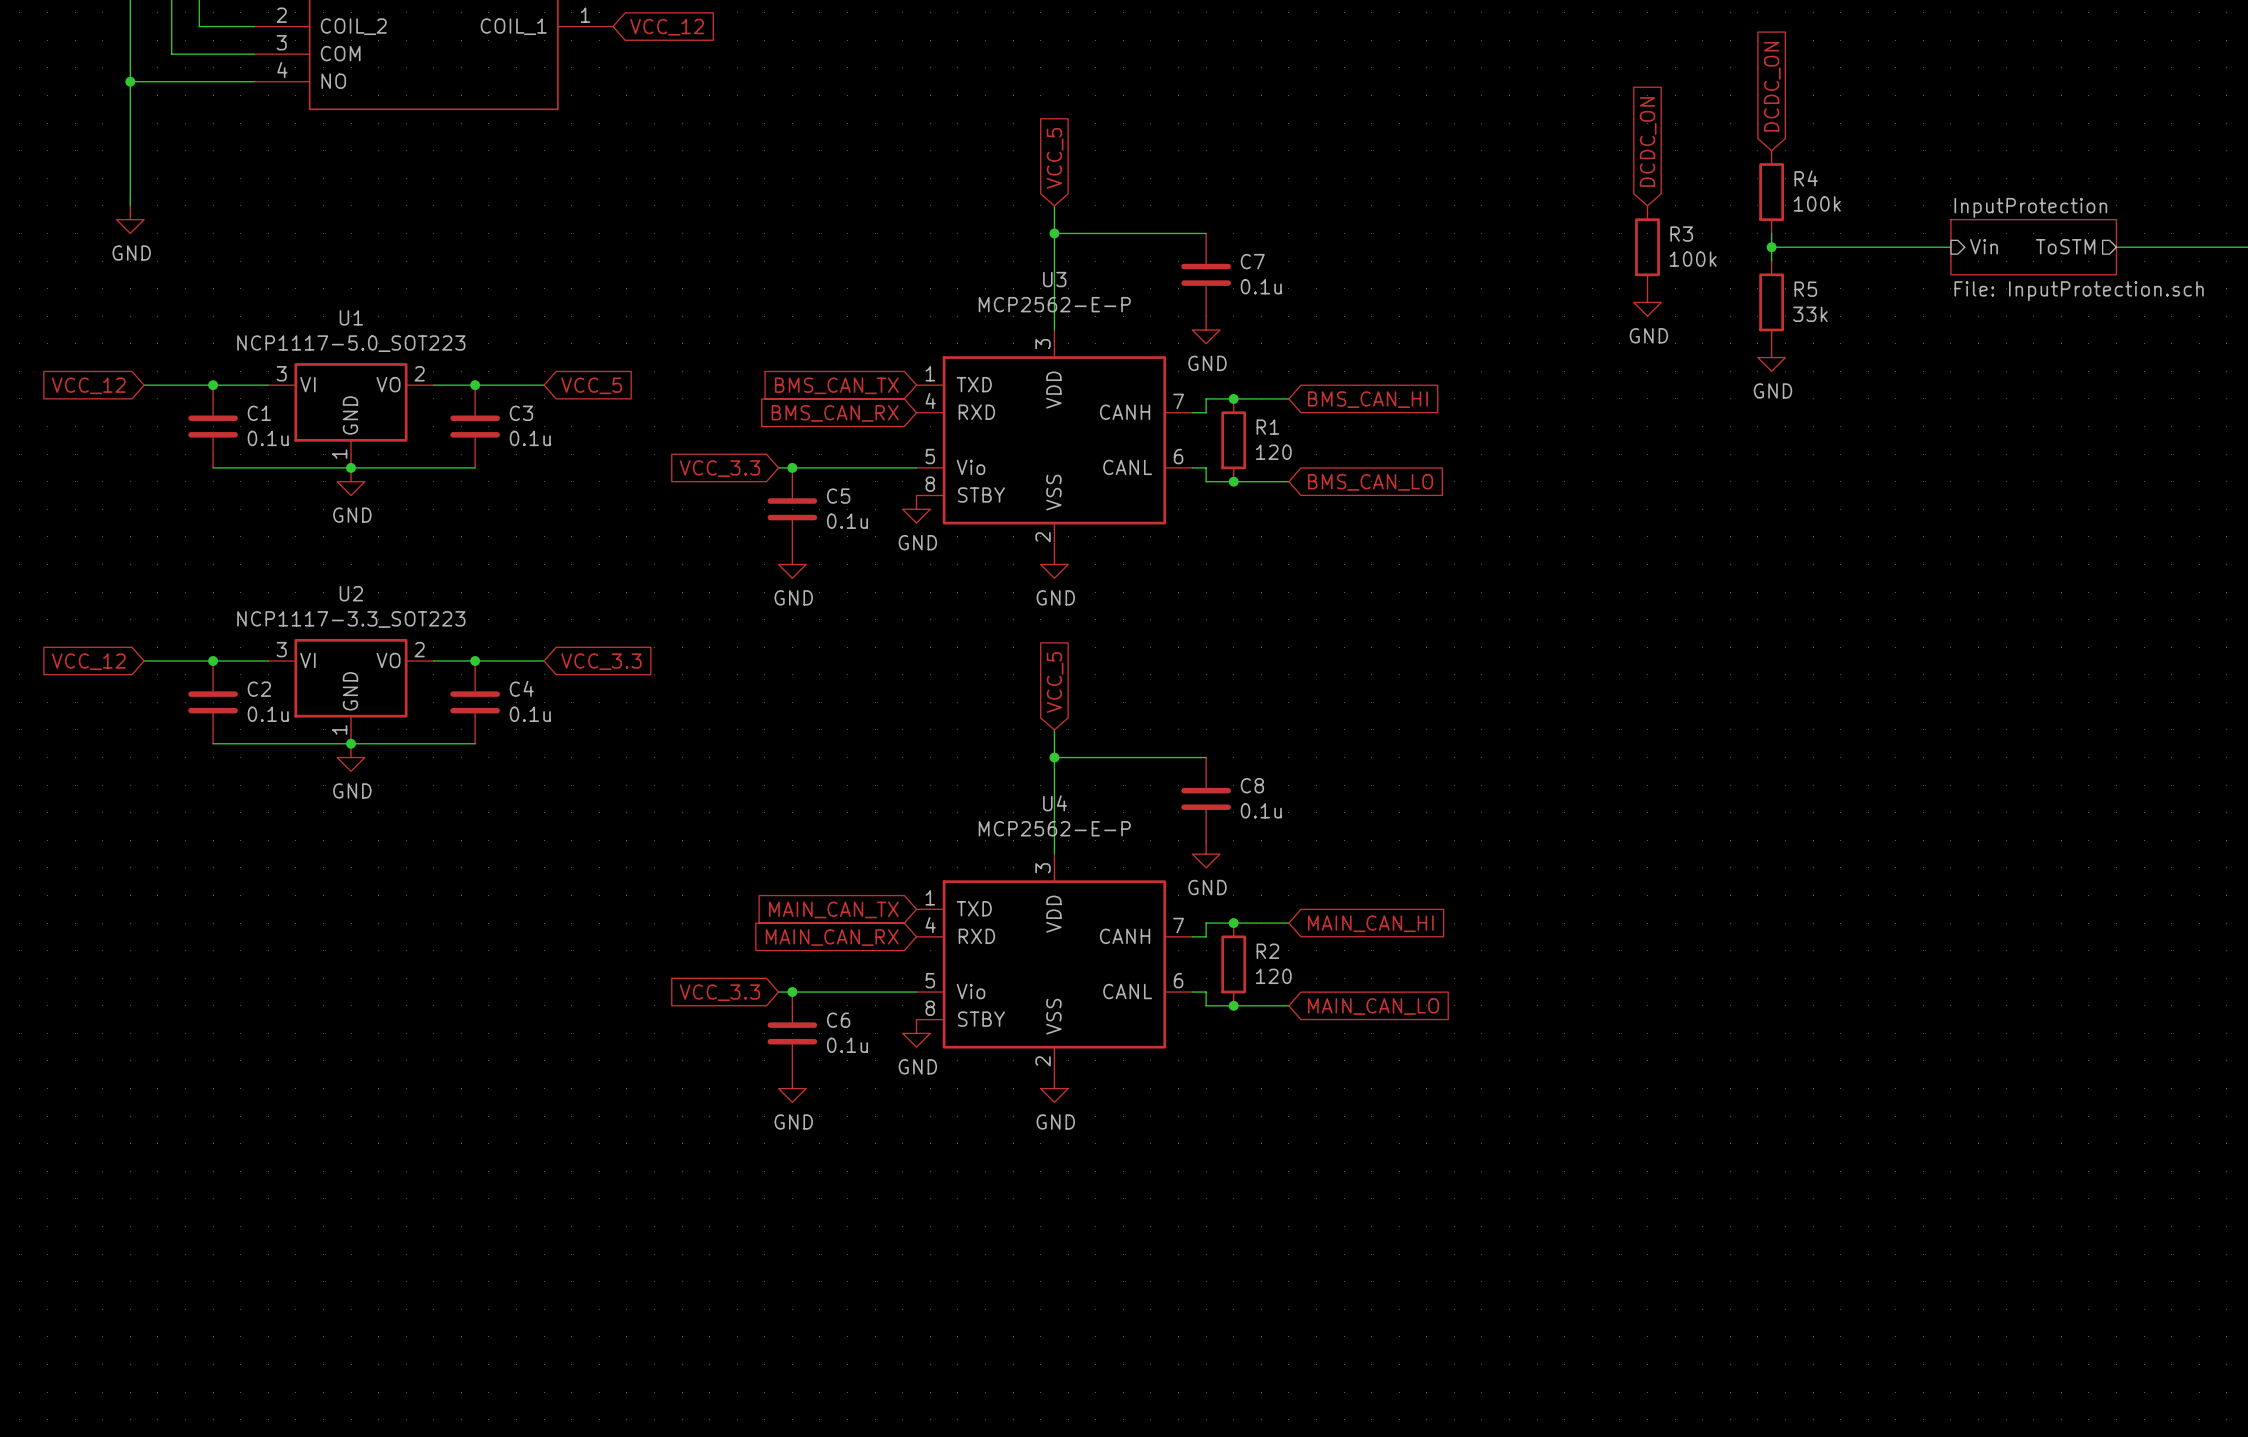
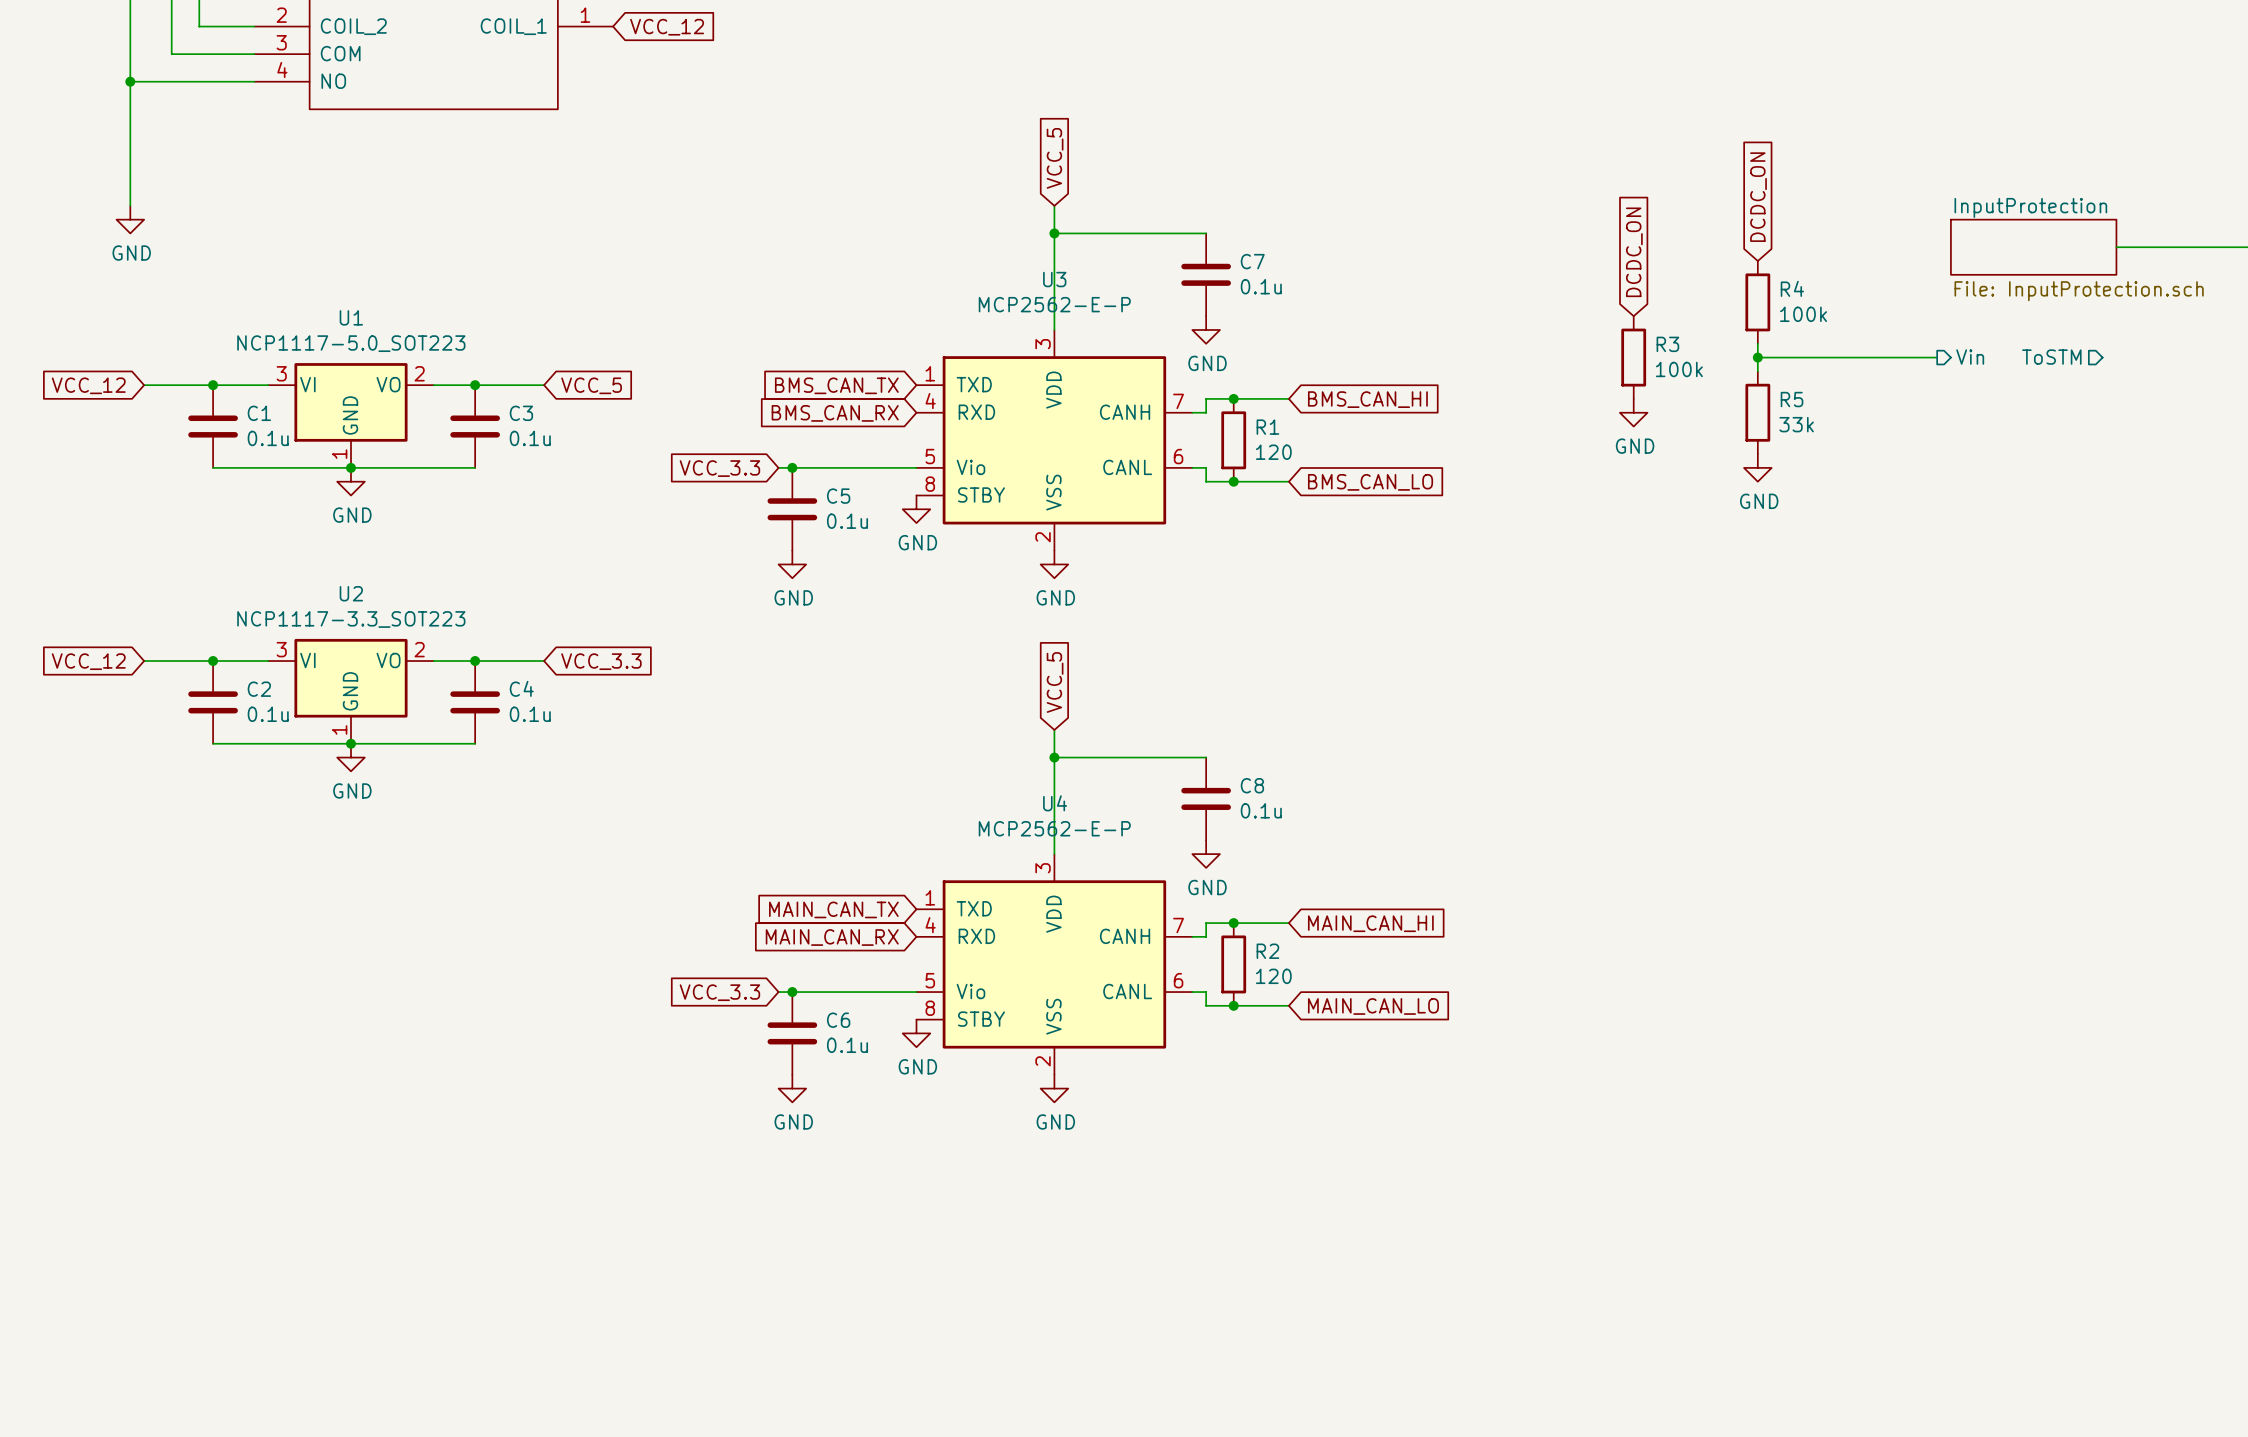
global label position: DCDC_ON (1772, 86) -> DCDC_ON (1758, 197)
global label position: DCDC_ON (1648, 141) -> DCDC_ON (1634, 252)
R4 position: (1771, 192) -> (1757, 302)
wire: (1771, 233) (1771, 261) -> (1757, 343) (1757, 371)
sheet pin position: Vin (1983, 246) -> Vin (1970, 357)
sheet pin position: ToSTM (2065, 246) -> ToSTM (2051, 357)
R3 position: (1647, 247) -> (1633, 357)
wire: (1771, 247) (1950, 247) -> (1757, 357) (1937, 357)
junction: (1771, 247) -> none
power symbol: GND (1647, 302) -> none
R5 position: (1771, 302) -> (1757, 412)
junction: none -> (1757, 357)
power symbol: GND (1771, 357) -> none
power symbol: none -> GND (1633, 412)
power symbol: none -> GND (1757, 467)

